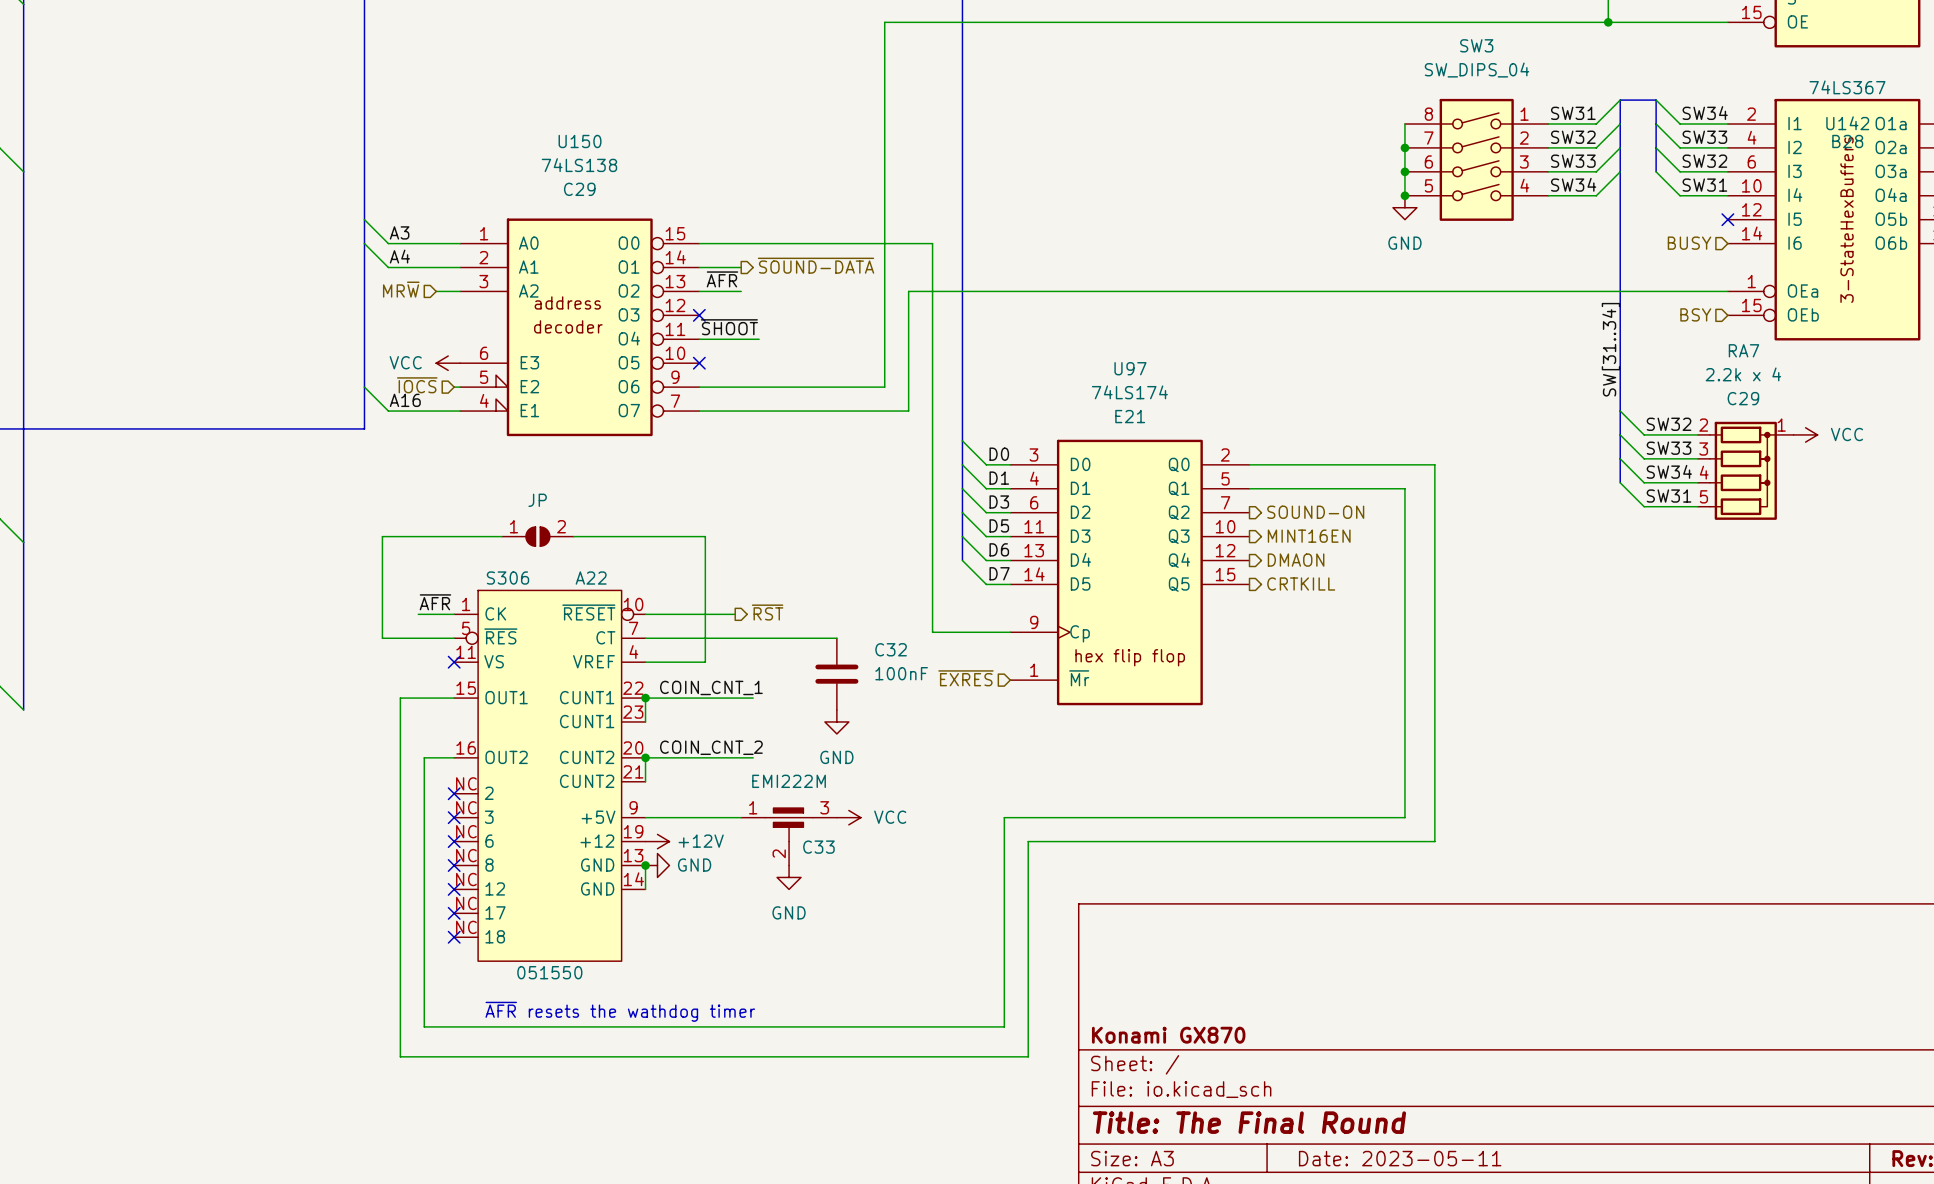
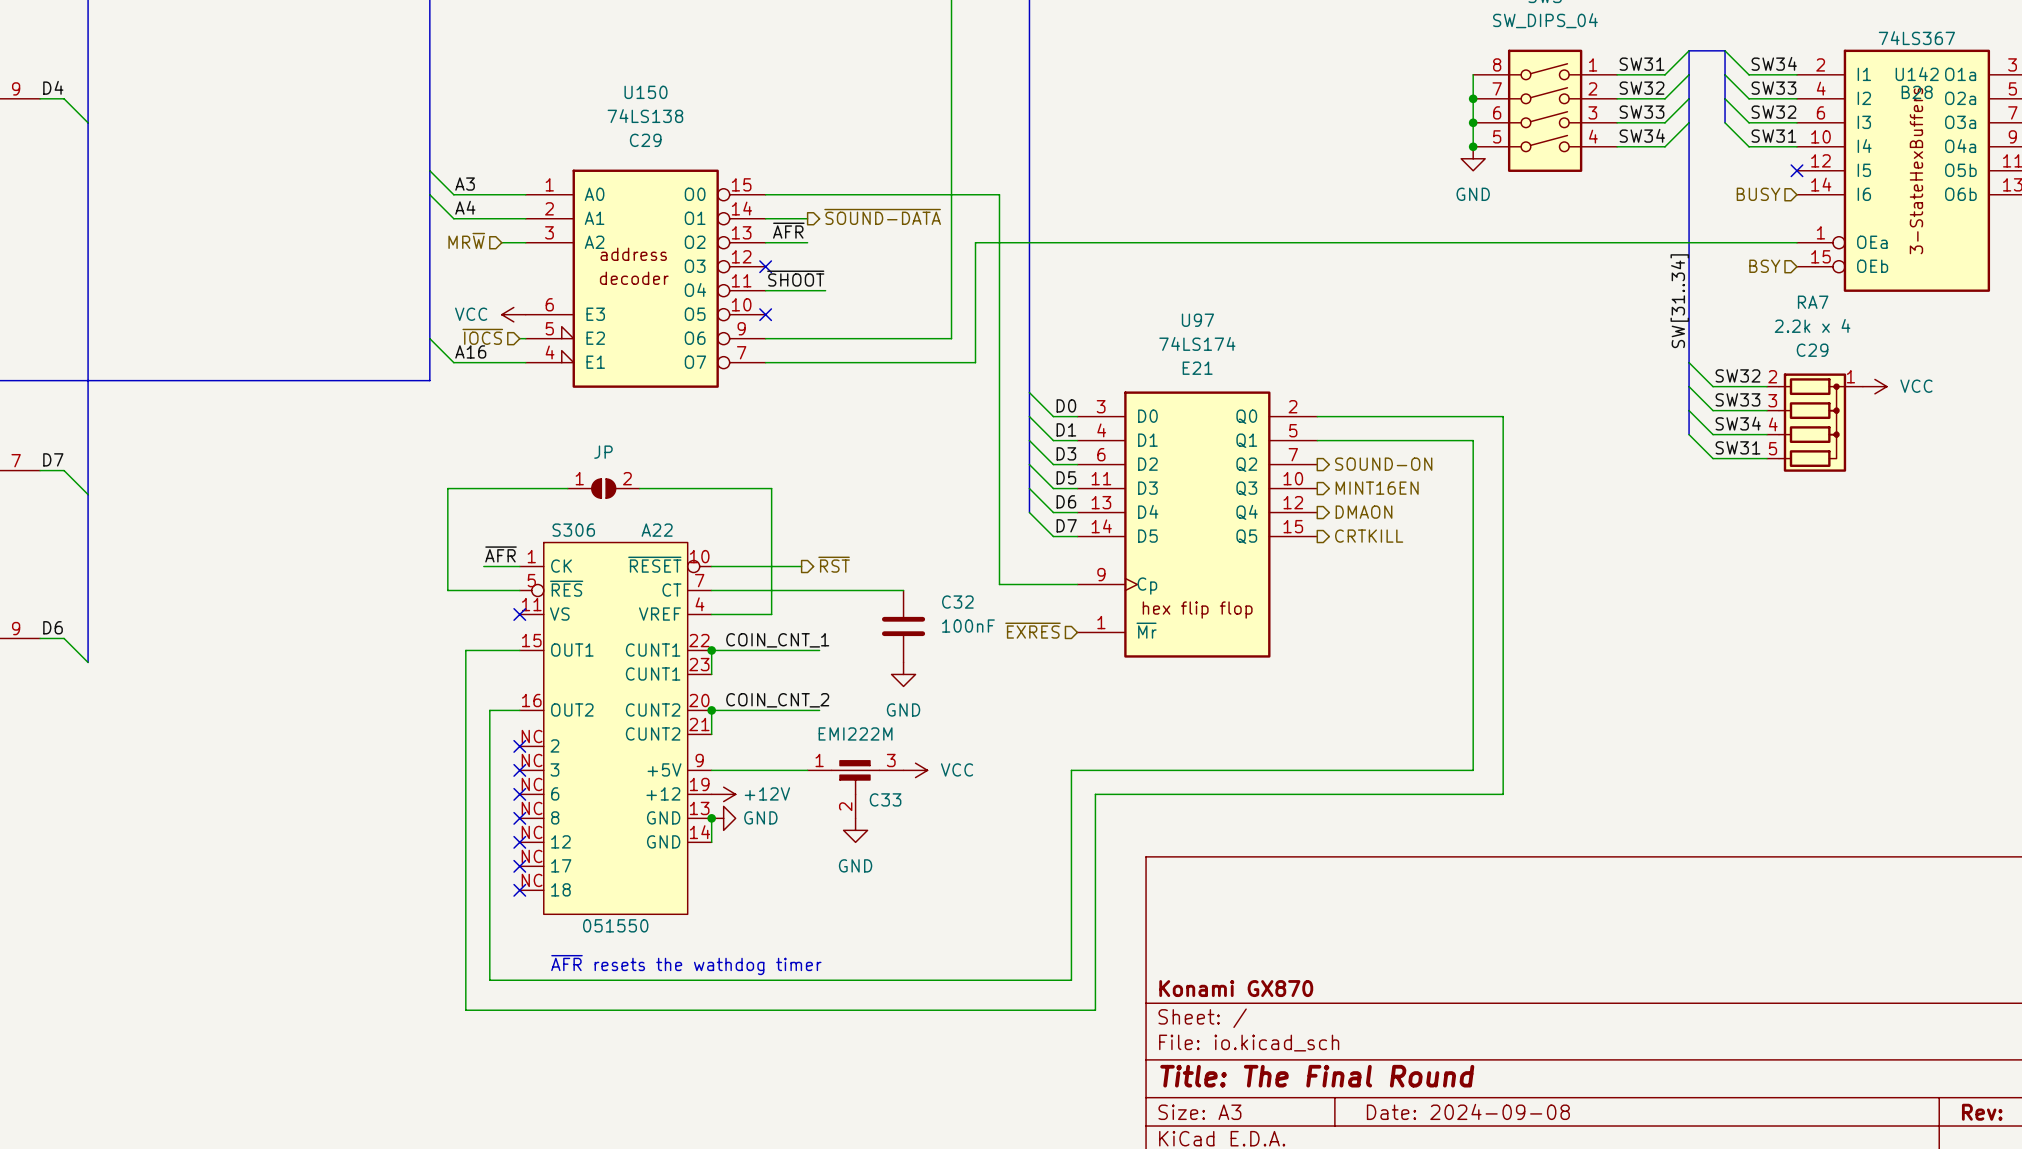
title block: Date: 2023-05-11 (1400, 1158) -> Date: 2024-09-08 (1468, 1111)

